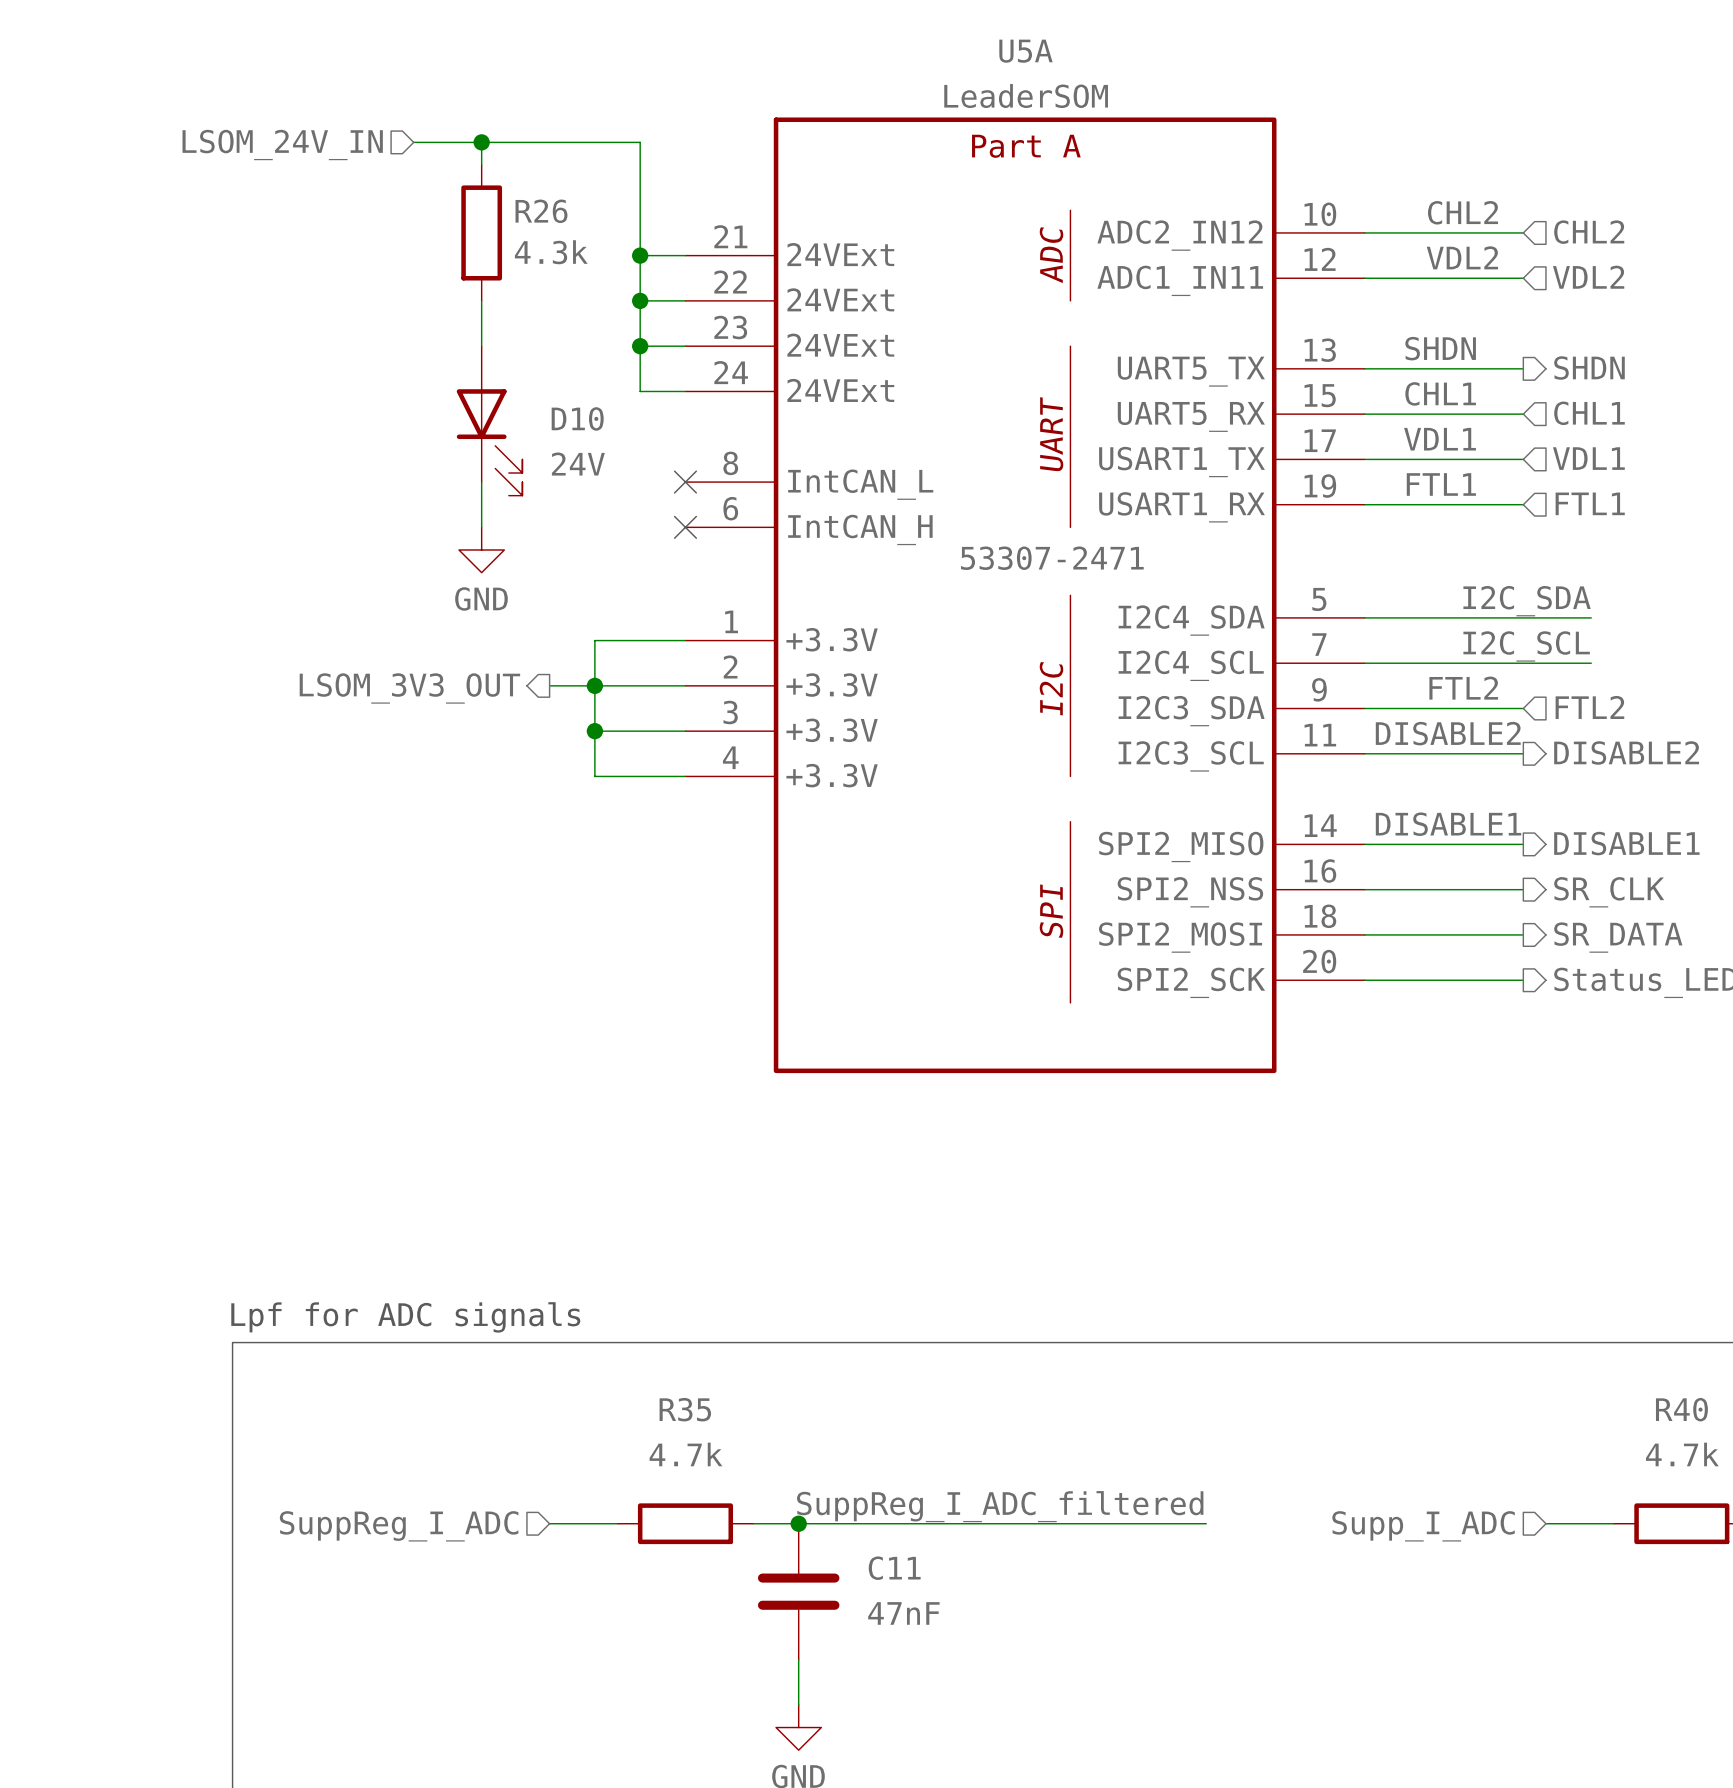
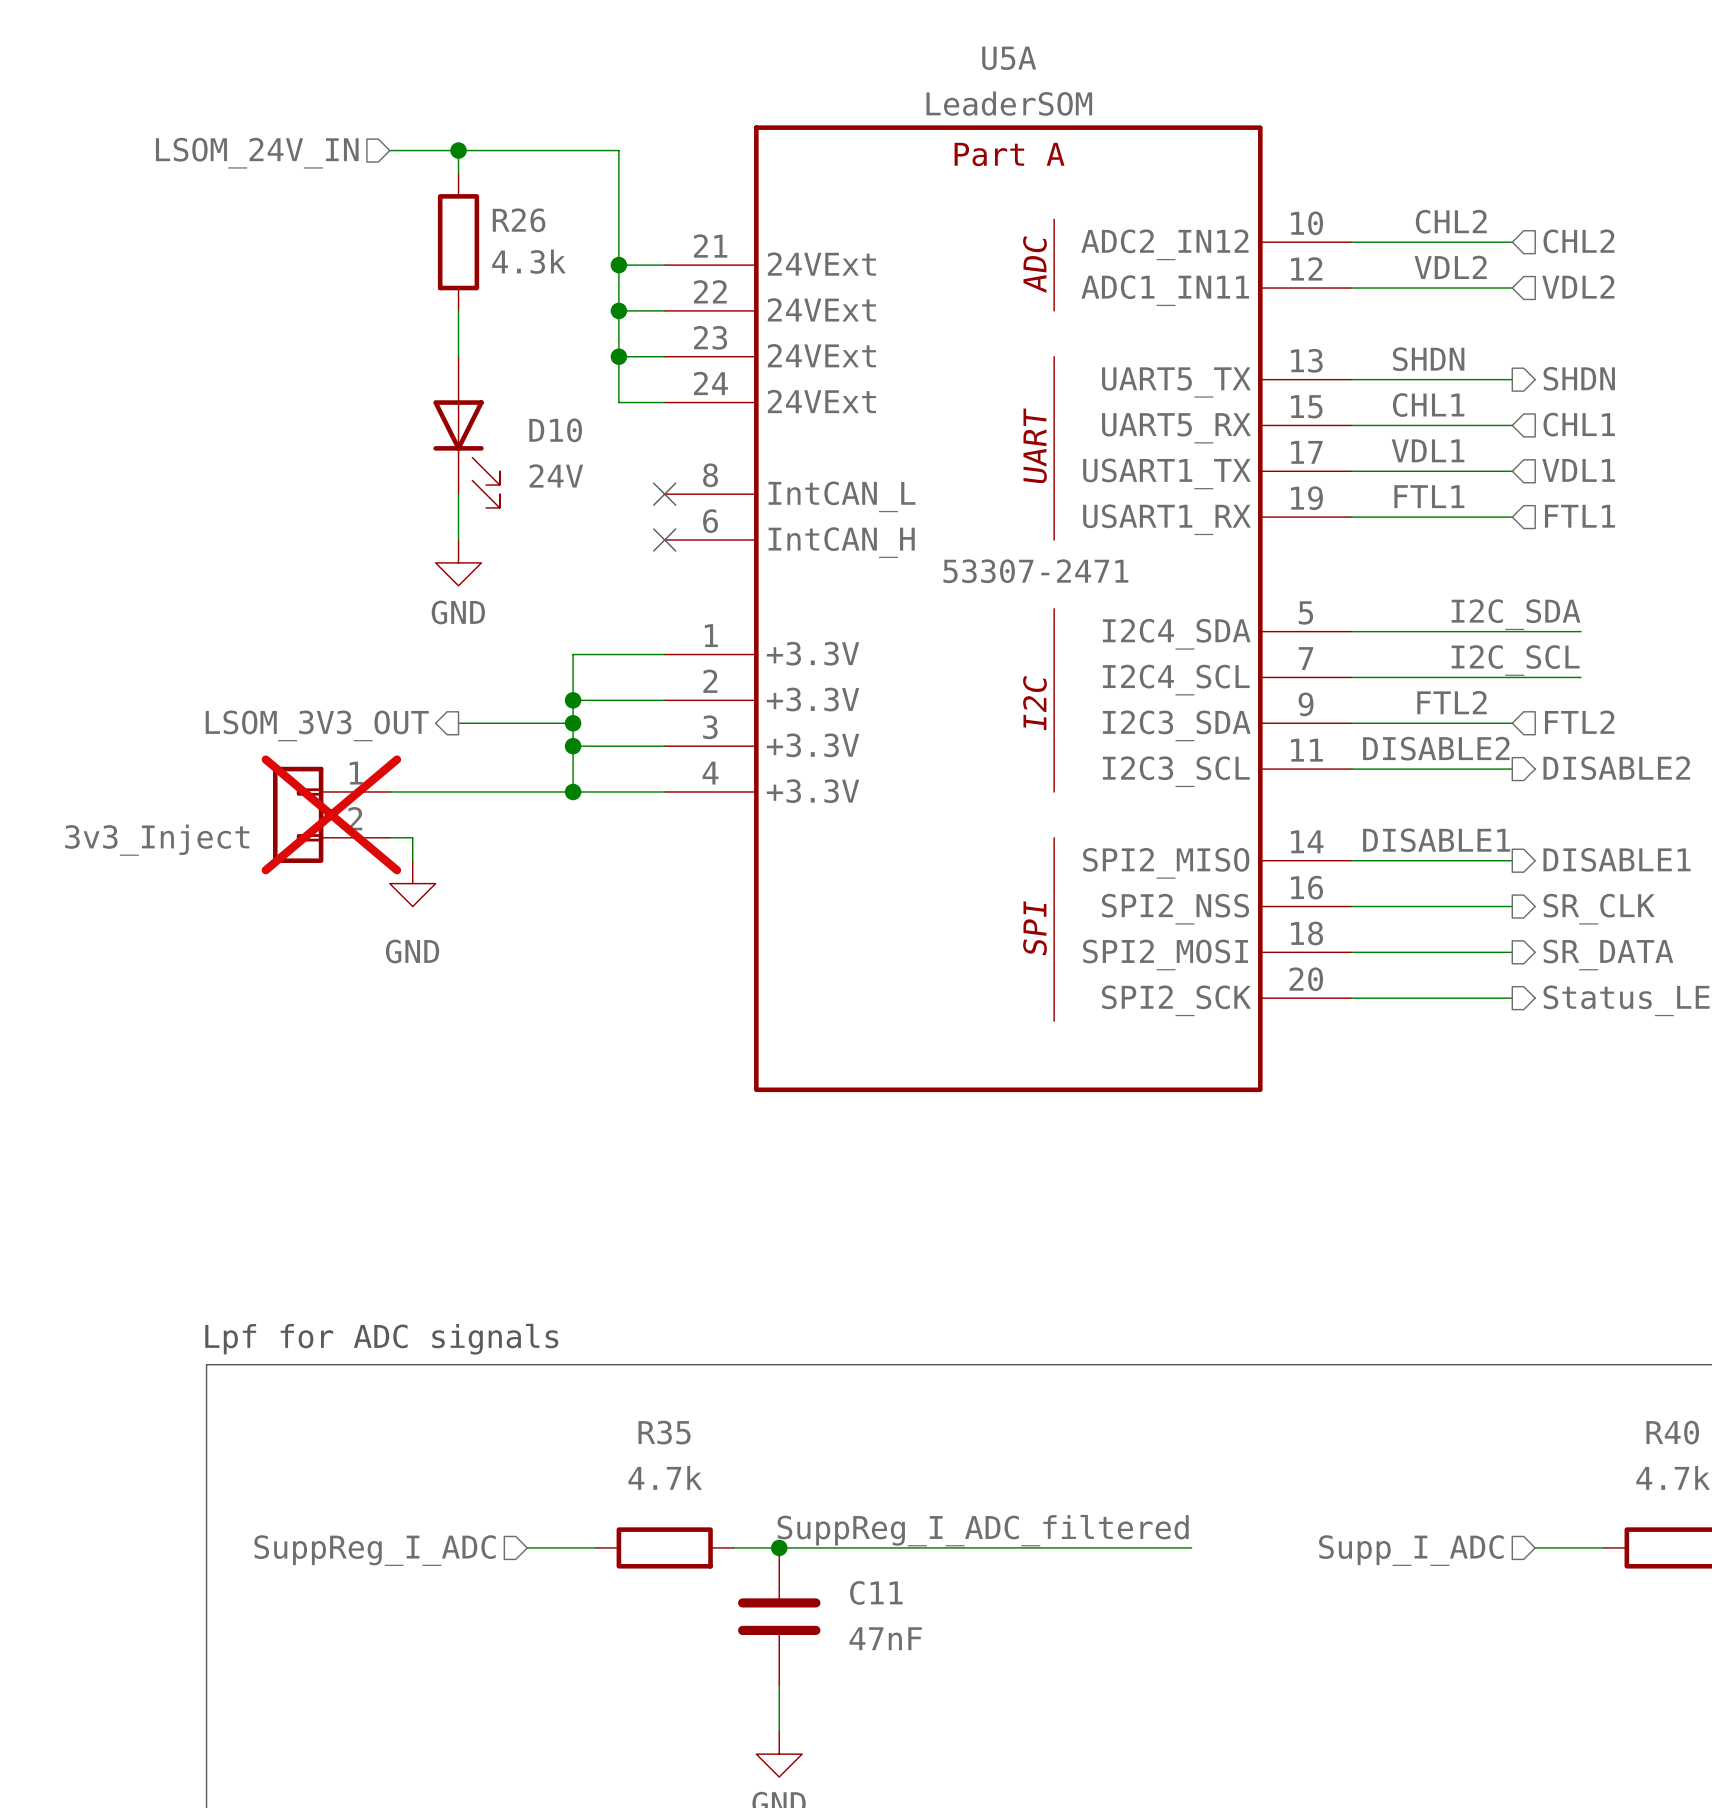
wire: (549, 685) (594, 685) -> none
hierarchical label position: LSOM_3V3_OUT (409, 688) -> LSOM_3V3_OUT (317, 725)
wire: none -> (458, 723) (573, 723)
junction: none -> (573, 723)
wire: none -> (389, 791) (573, 791)
junction: none -> (573, 791)
part: none -> 3v3_Inject (331, 814)
wire: none -> (389, 837) (412, 837) (412, 860)
power symbol: none -> GND (412, 883)

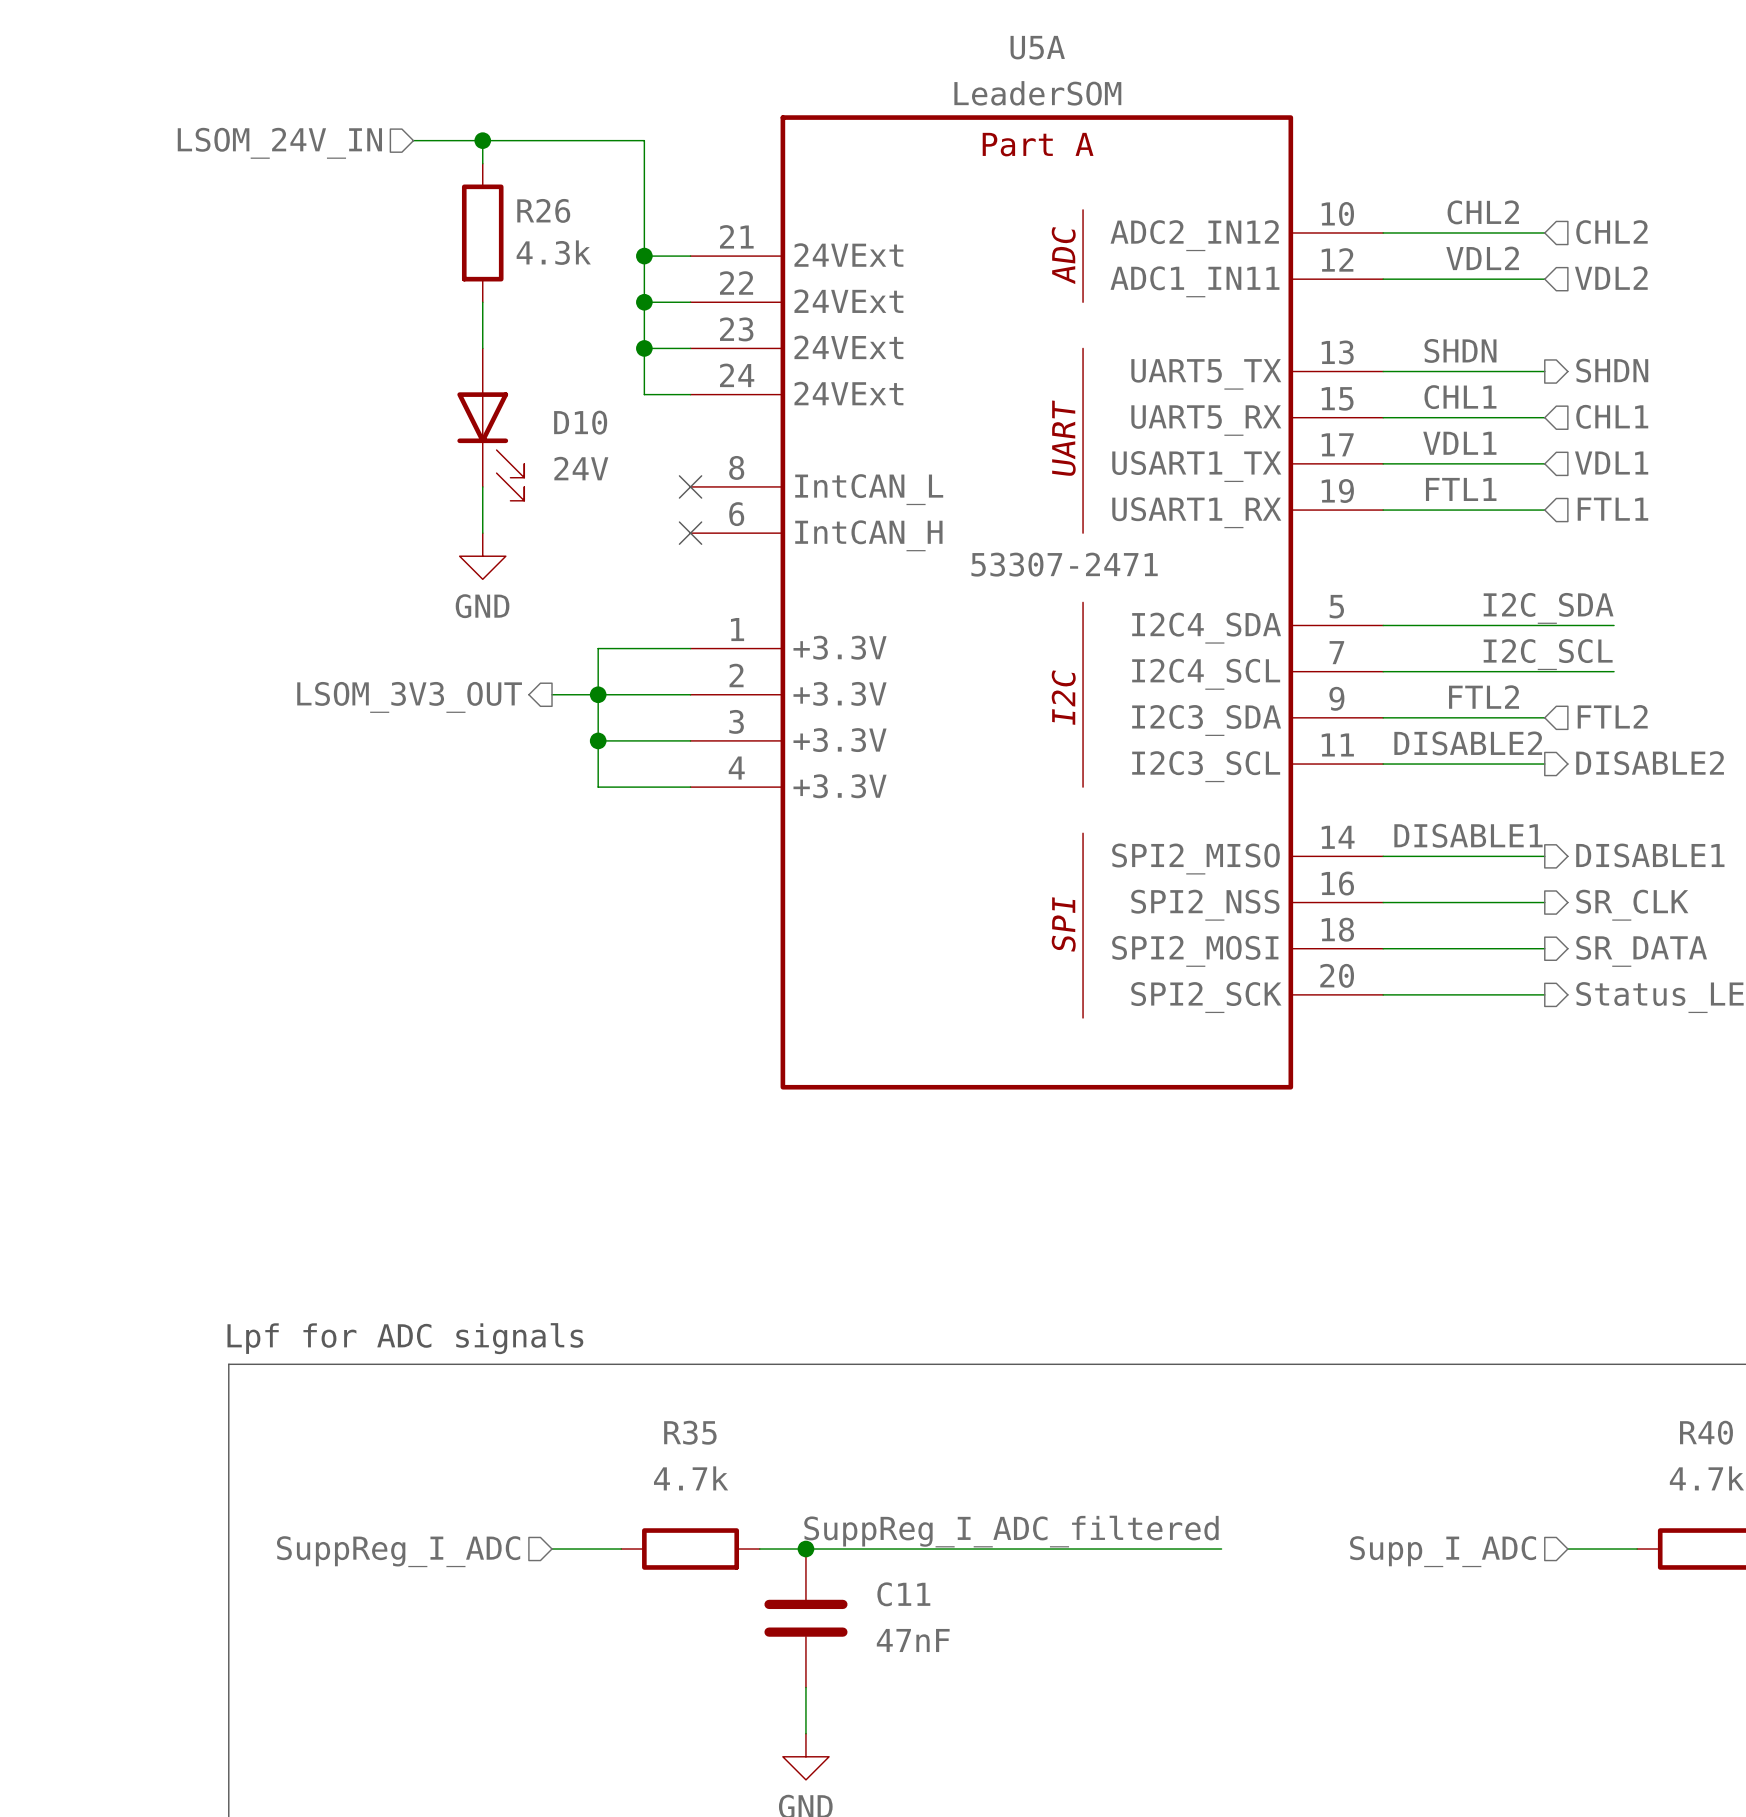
wire: none -> (552, 694) (598, 694)
wire: (458, 723) (573, 723) -> none
junction: (573, 723) -> none
hierarchical label position: LSOM_3V3_OUT (317, 725) -> LSOM_3V3_OUT (409, 697)
wire: (389, 791) (573, 791) -> none
junction: (573, 791) -> none
part: 3v3_Inject (331, 814) -> none
wire: (389, 837) (412, 837) (412, 860) -> none
power symbol: GND (412, 883) -> none

